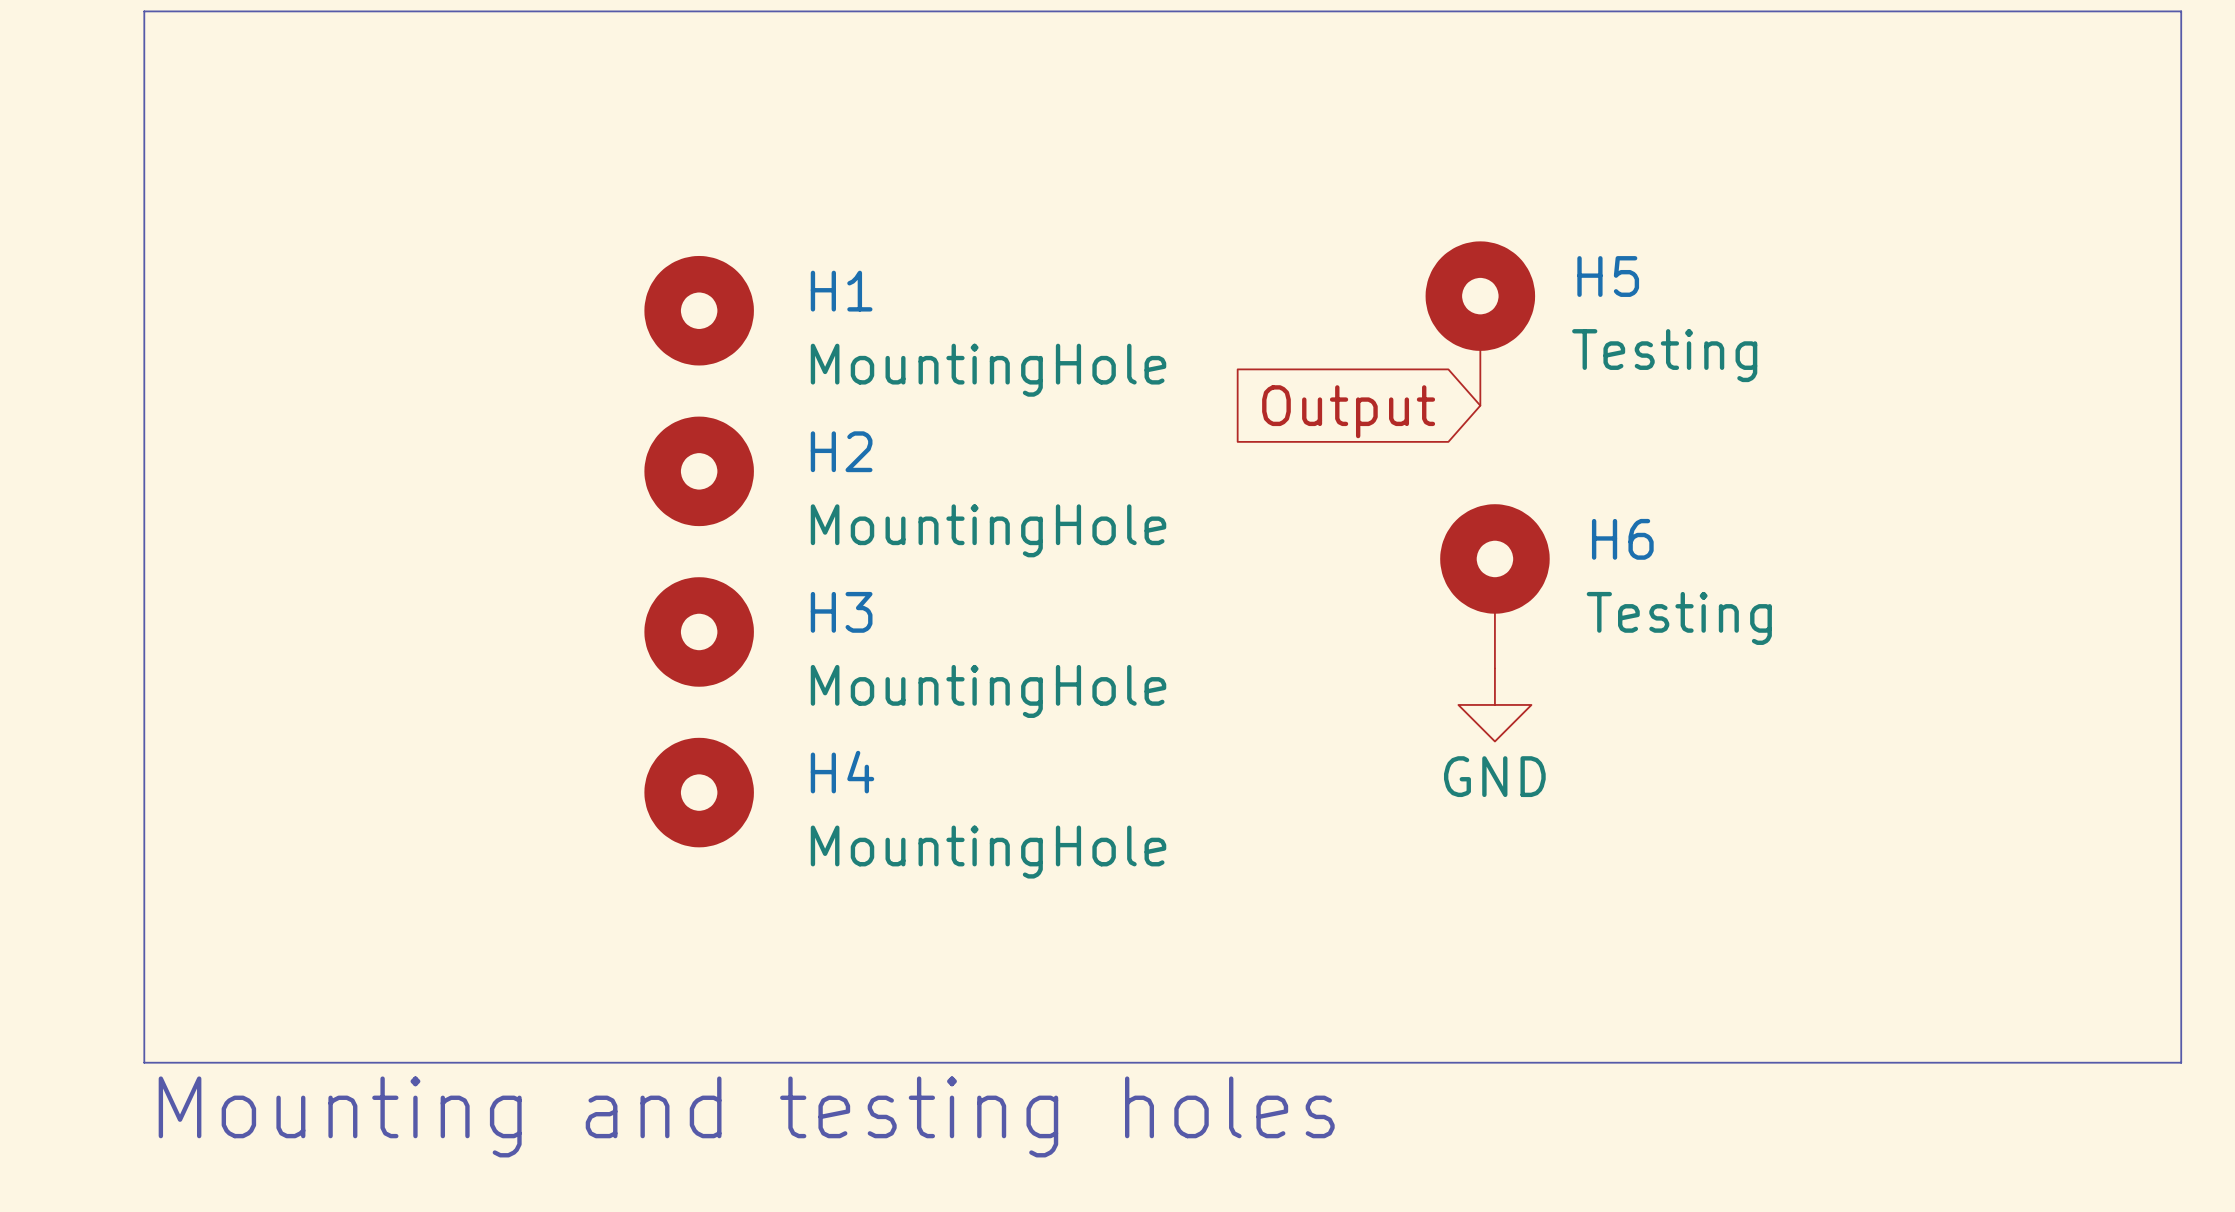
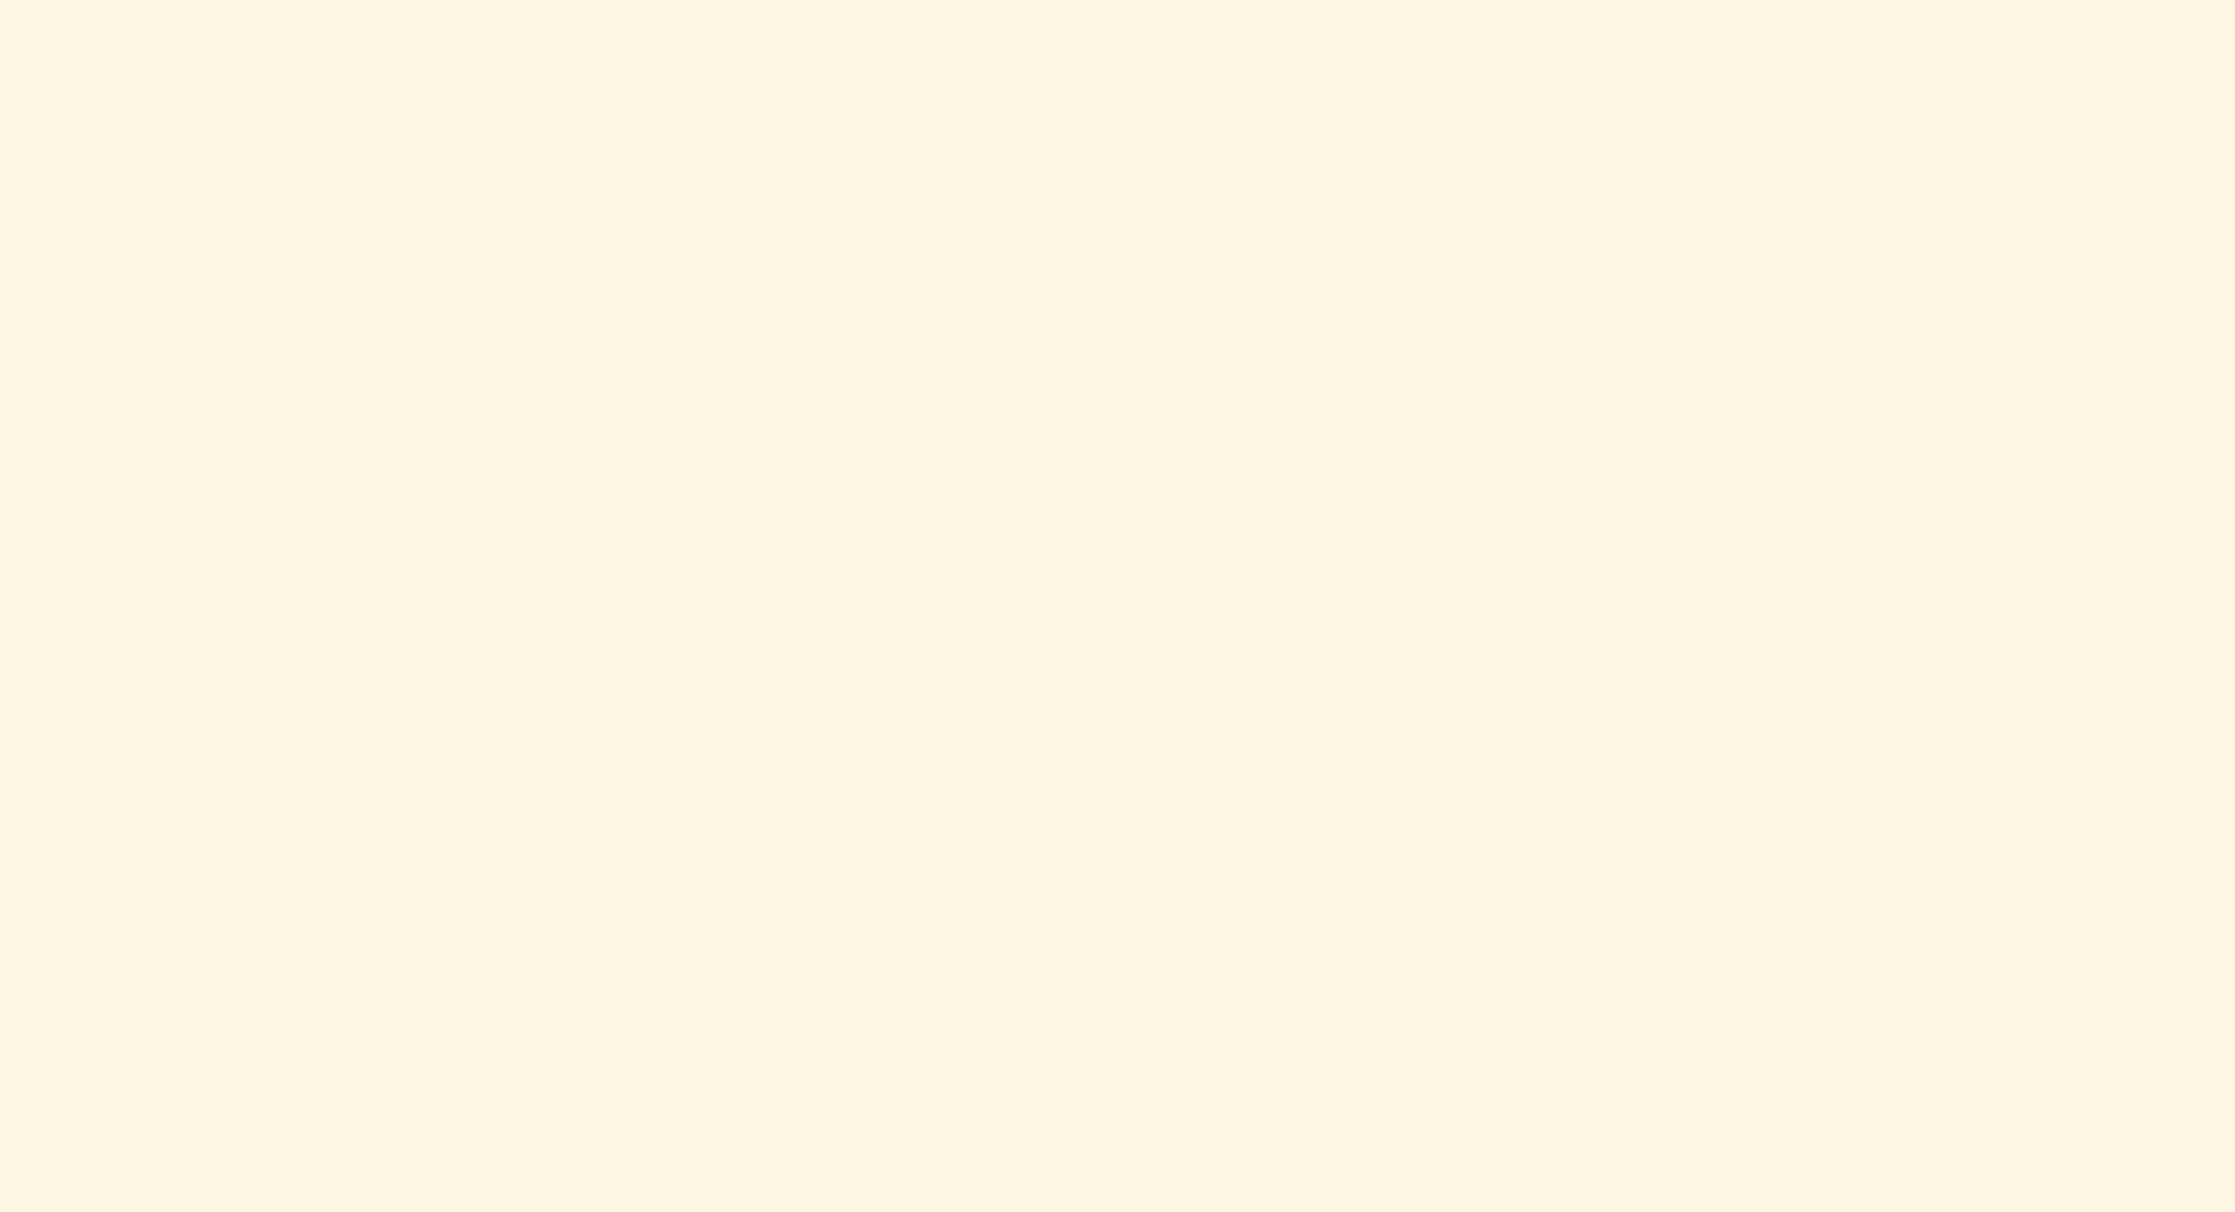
line: (144, 11) (2181, 11) (2181, 1062) (144, 1062) (144, 11) -> none
H1: MountingHole (699, 310) -> none
H5: Testing (1480, 323) -> none
global label: Output (1348, 411) -> none
H2: MountingHole (699, 471) -> none
H6: Testing (1494, 586) -> none
H3: MountingHole (699, 631) -> none
power symbol: GND (1494, 704) -> none
H4: MountingHole (699, 792) -> none
text: Mounting and testing holes (746, 1116) -> none

